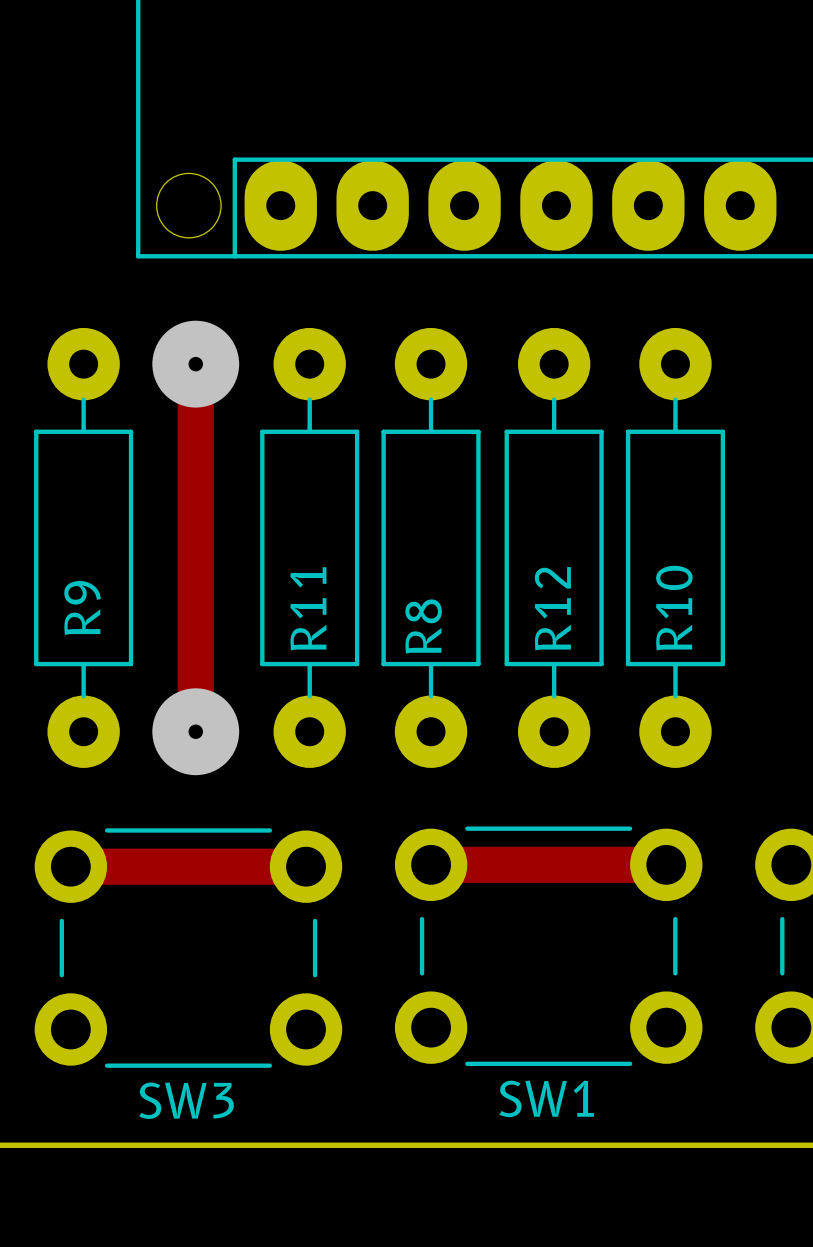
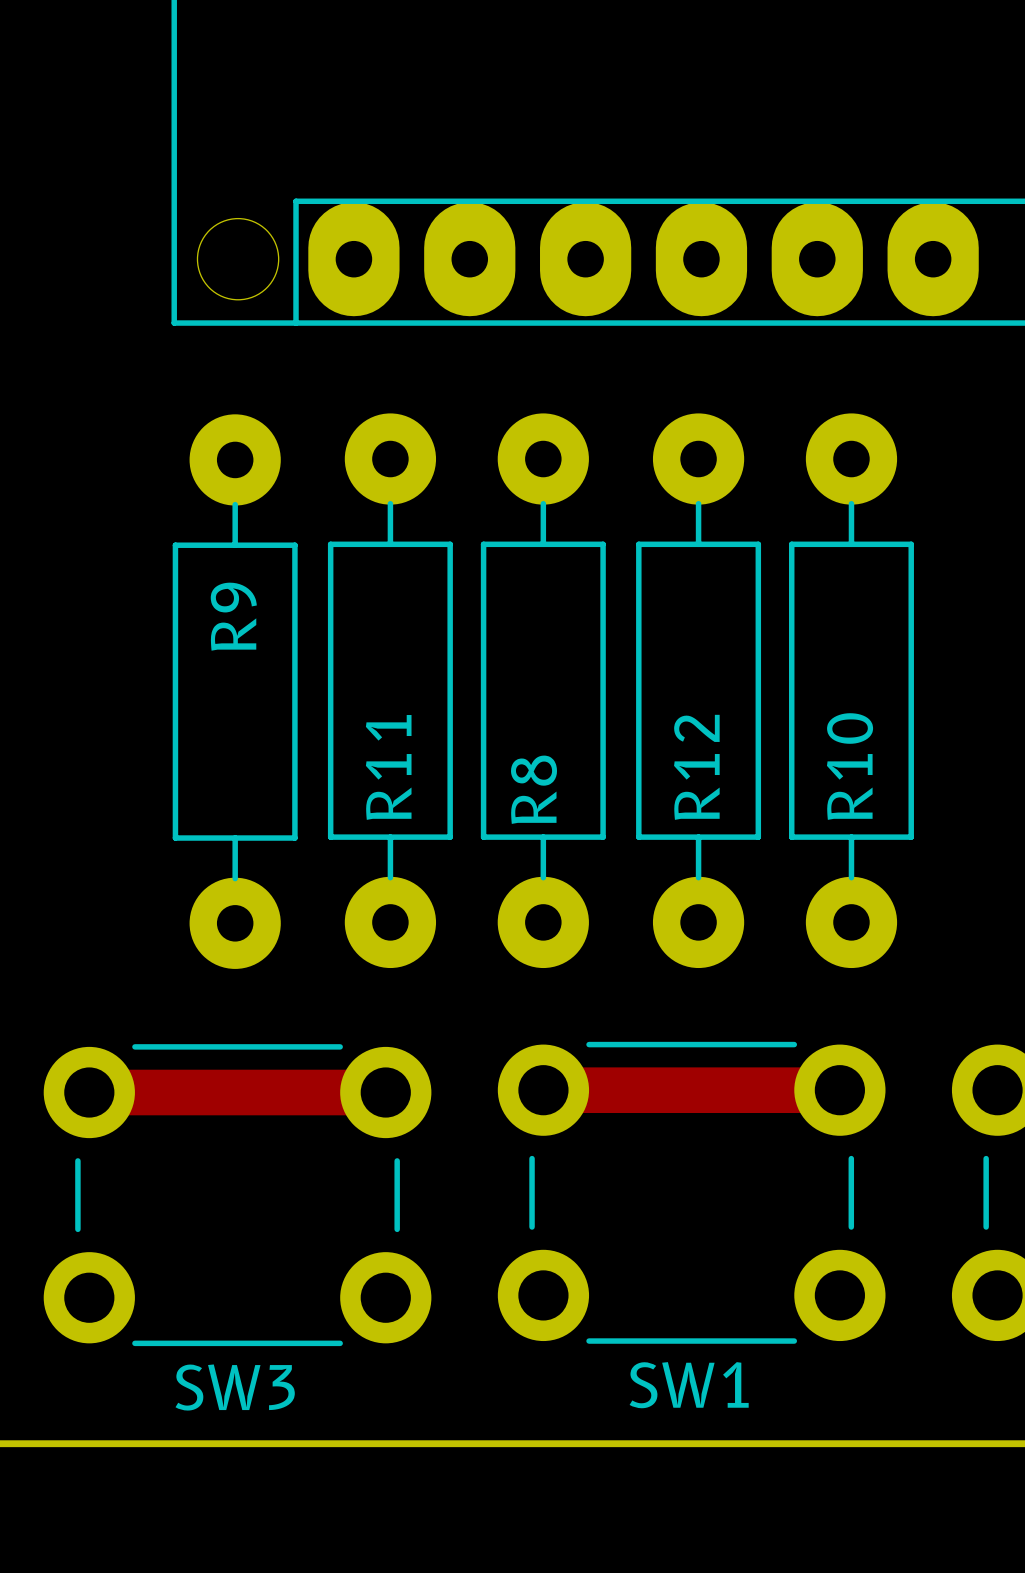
track: (195, 364) (195, 731) -> none
via: (195, 364) -> none
R9 position: (83, 547) -> (235, 691)
R9 name position: R9 (82, 607) -> R9 (233, 616)
via: (195, 731) -> none

